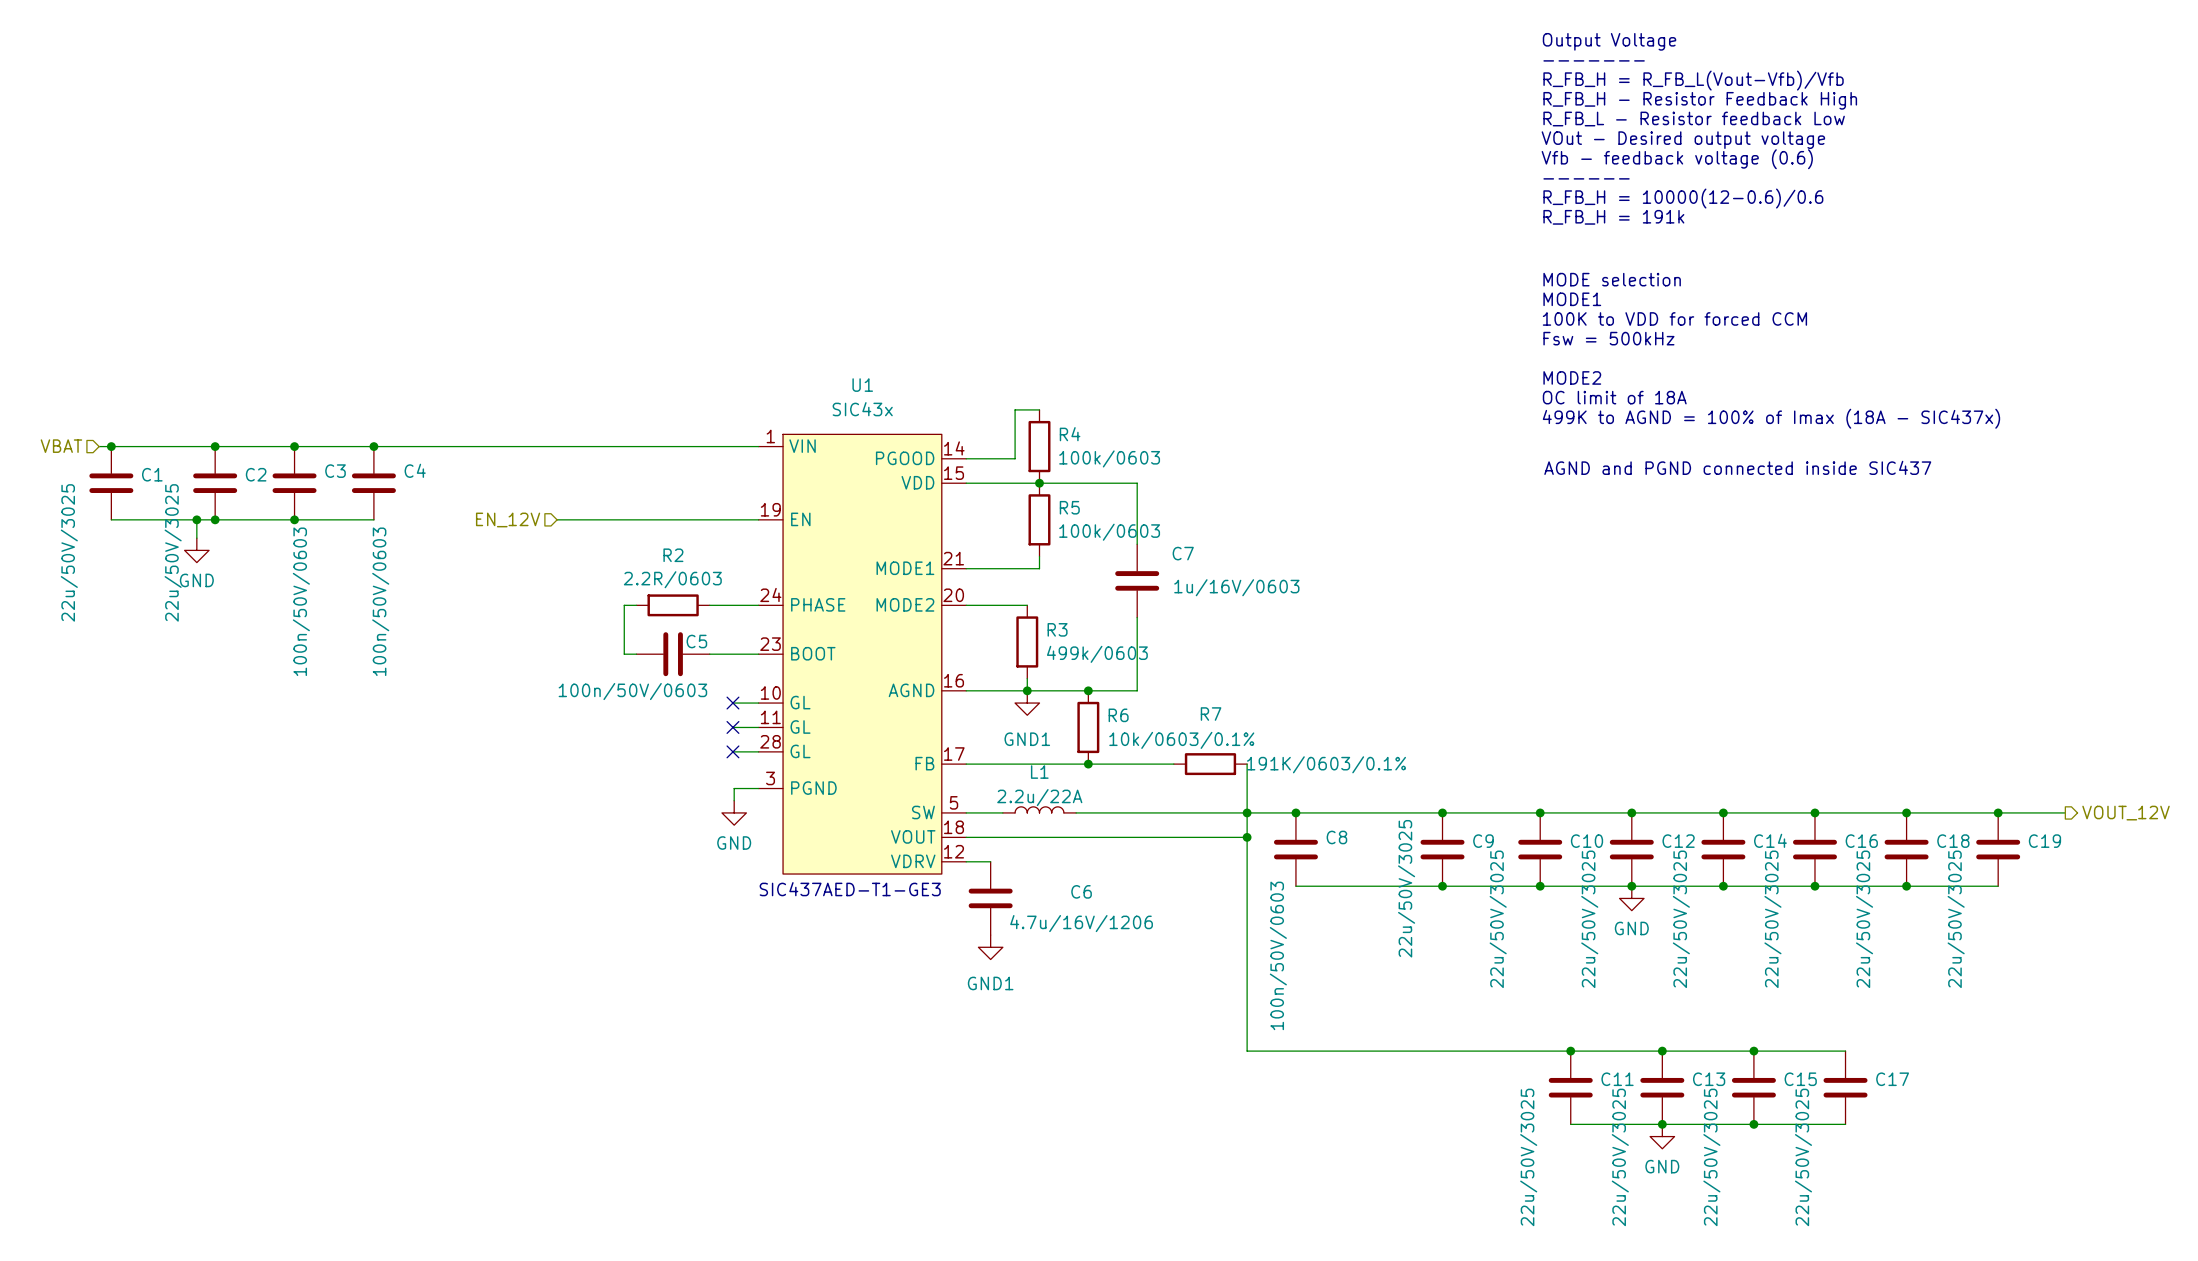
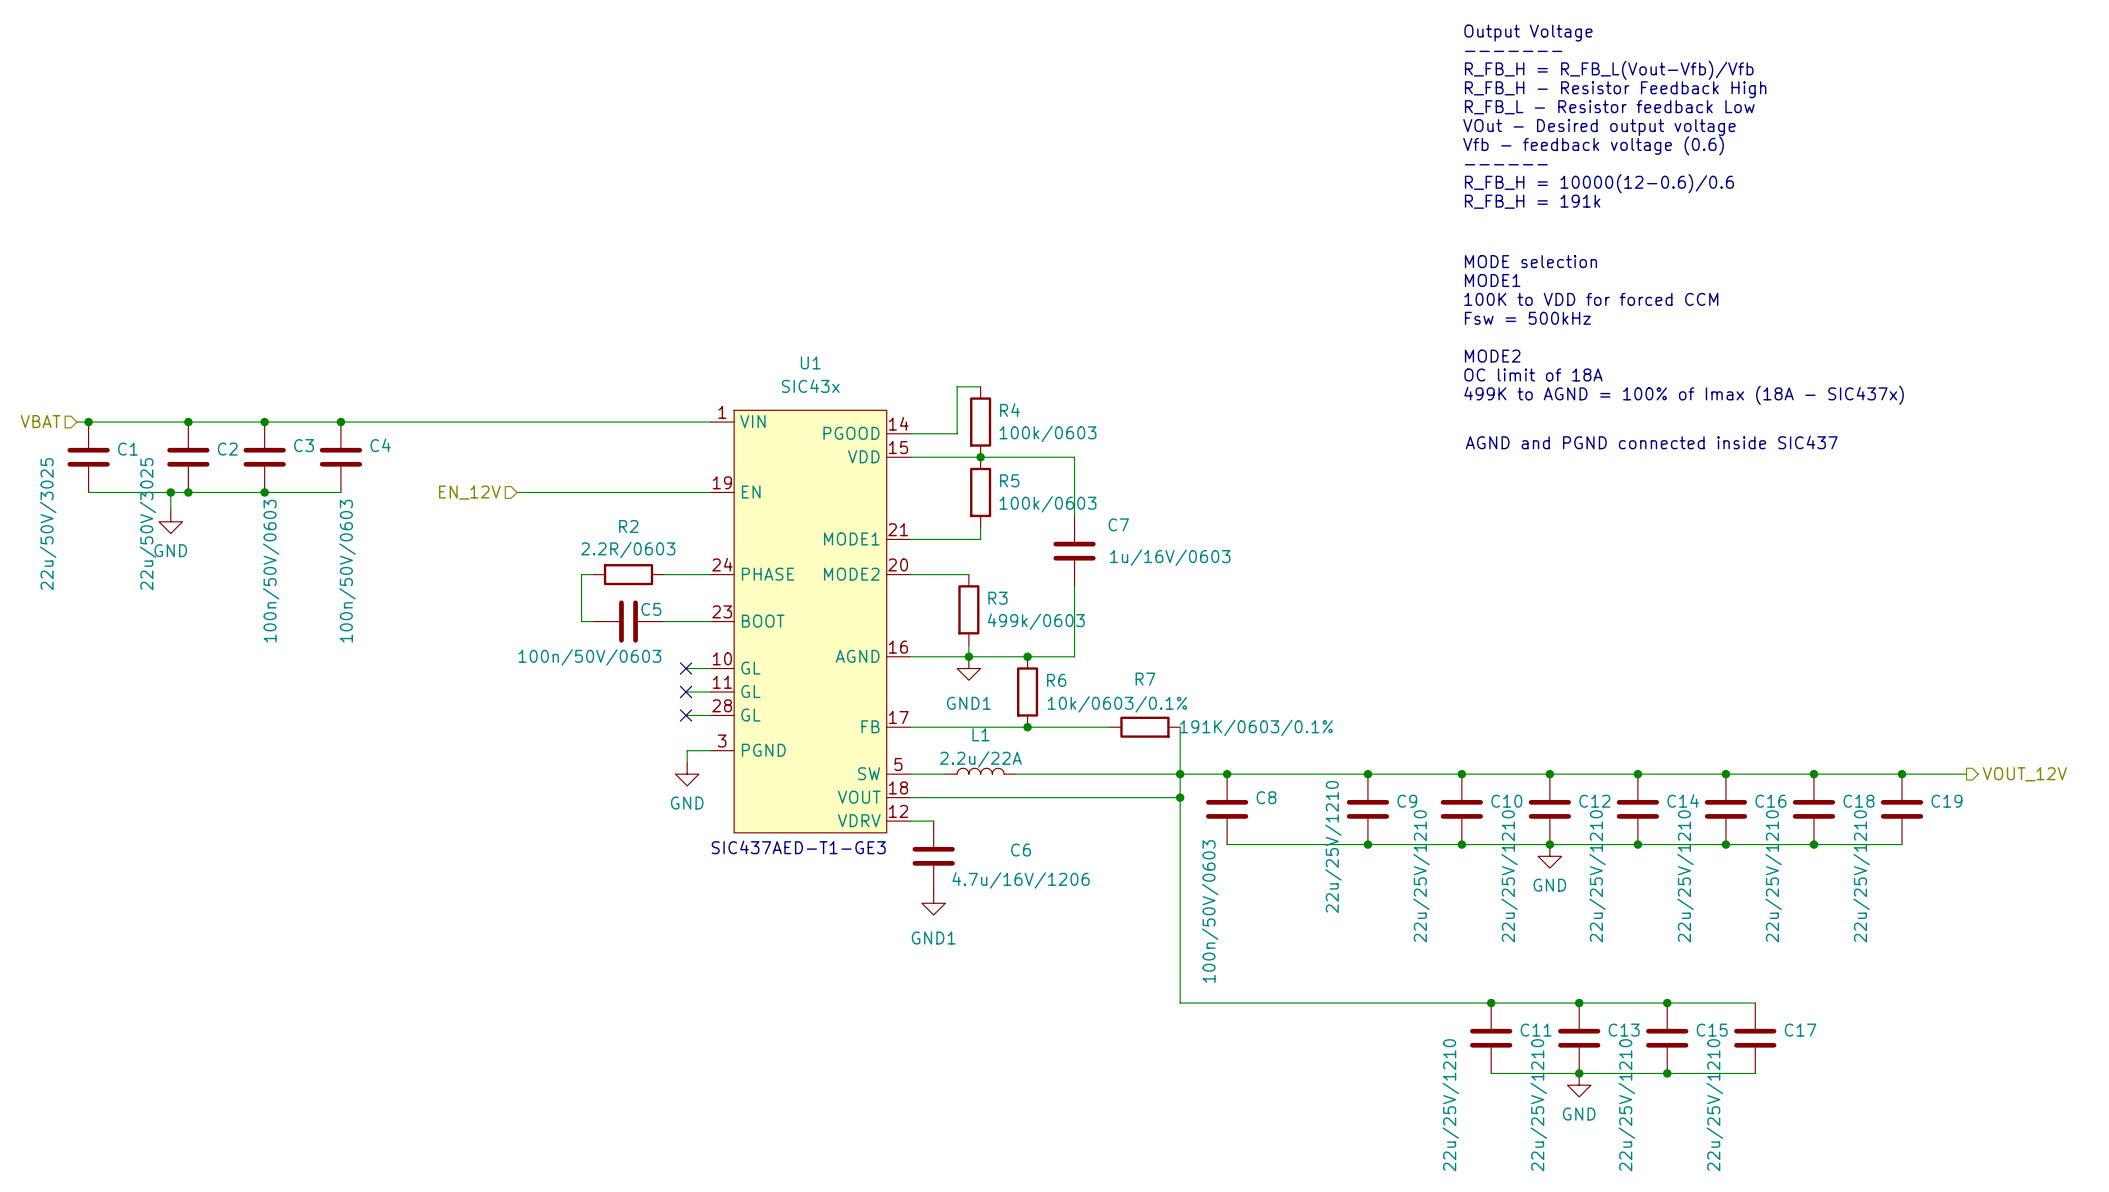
C9 value: 22u/50V/3025 (1406, 888) -> 22u/25V/1210 (1333, 847)
C10 value: 22u/50V/3025 (1498, 919) -> 22u/25V/1210 (1421, 876)
C12 value: 22u/50V/3025 (1589, 919) -> 22u/25V/1210 (1509, 876)
C14 value: 22u/50V/3025 (1681, 919) -> 22u/25V/1210 (1597, 876)
C16 value: 22u/50V/3025 (1772, 919) -> 22u/25V/1210 (1685, 876)
C18 value: 22u/50V/3025 (1864, 919) -> 22u/25V/1210 (1773, 876)
C19 value: 22u/50V/3025 (1956, 919) -> 22u/25V/1210 (1861, 876)
C11 value: 22u/50V/3025 (1528, 1157) -> 22u/25V/1210 (1450, 1105)
C13 value: 22u/50V/3025 (1620, 1157) -> 22u/25V/1210 (1538, 1105)
C15 value: 22u/50V/3025 (1711, 1157) -> 22u/25V/1210 (1626, 1105)
C17 value: 22u/50V/3025 (1803, 1157) -> 22u/25V/1210 (1714, 1105)

